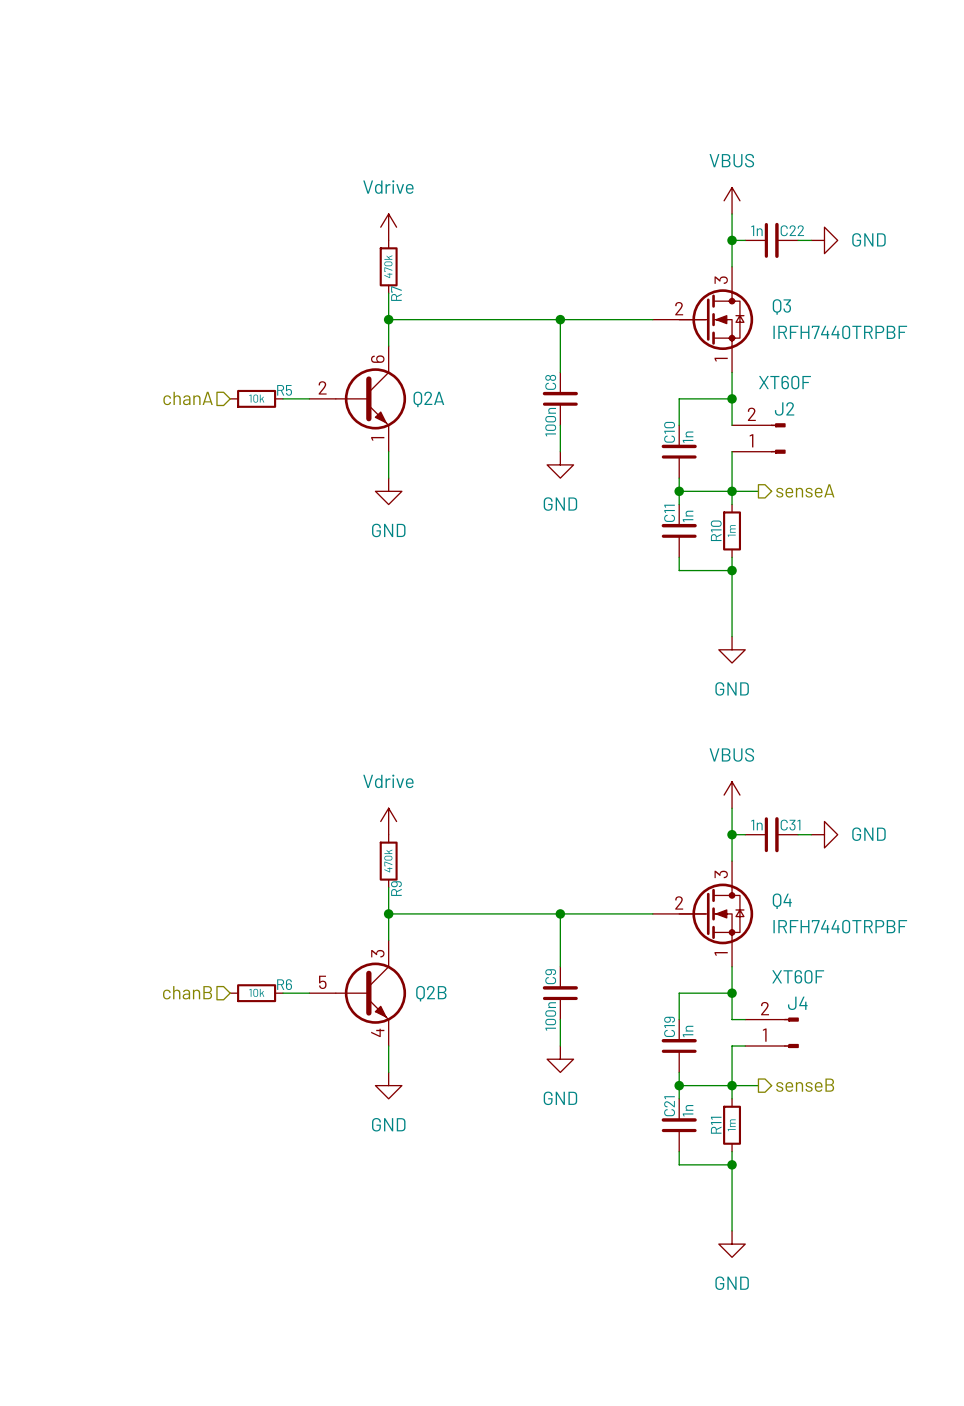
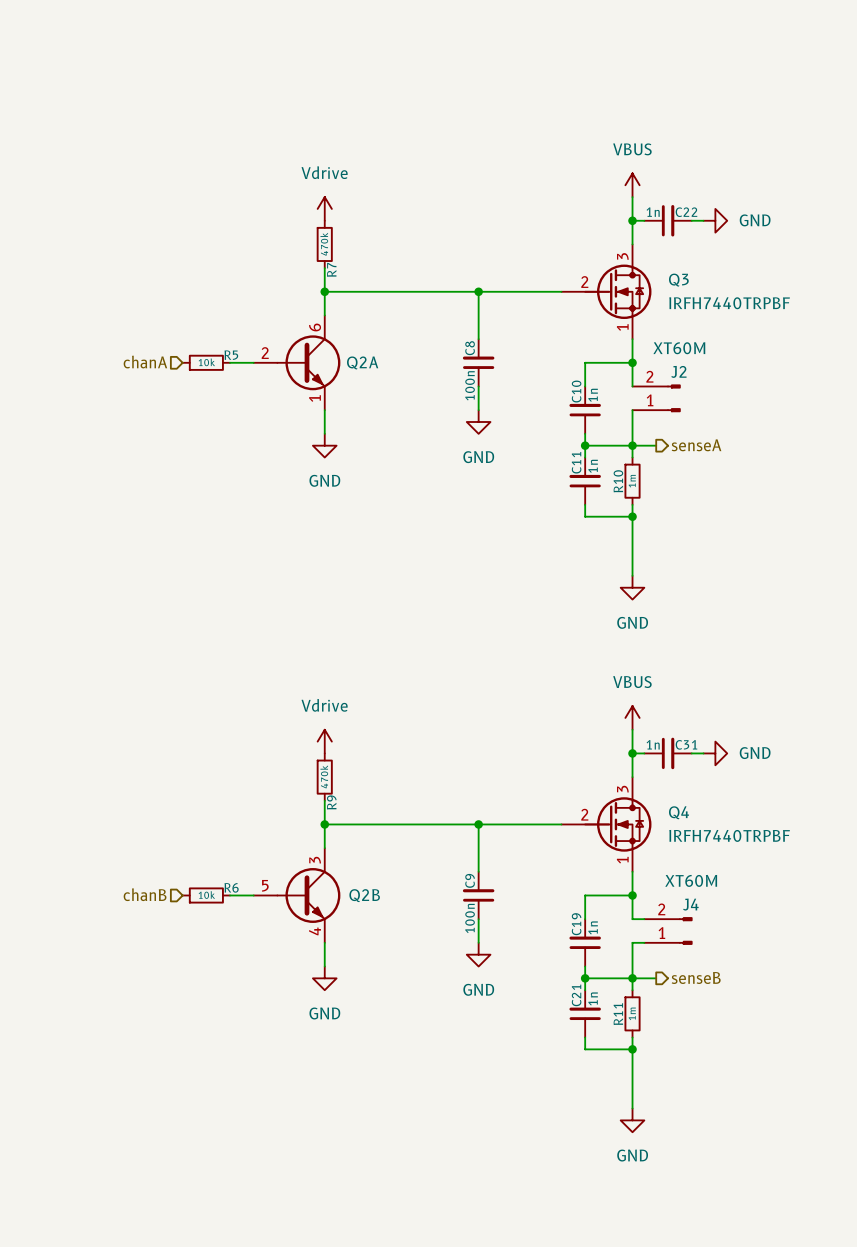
J2 value: XT60F (785, 382) -> XT60M (679, 348)
J4 value: XT60F (798, 976) -> XT60M (691, 880)

